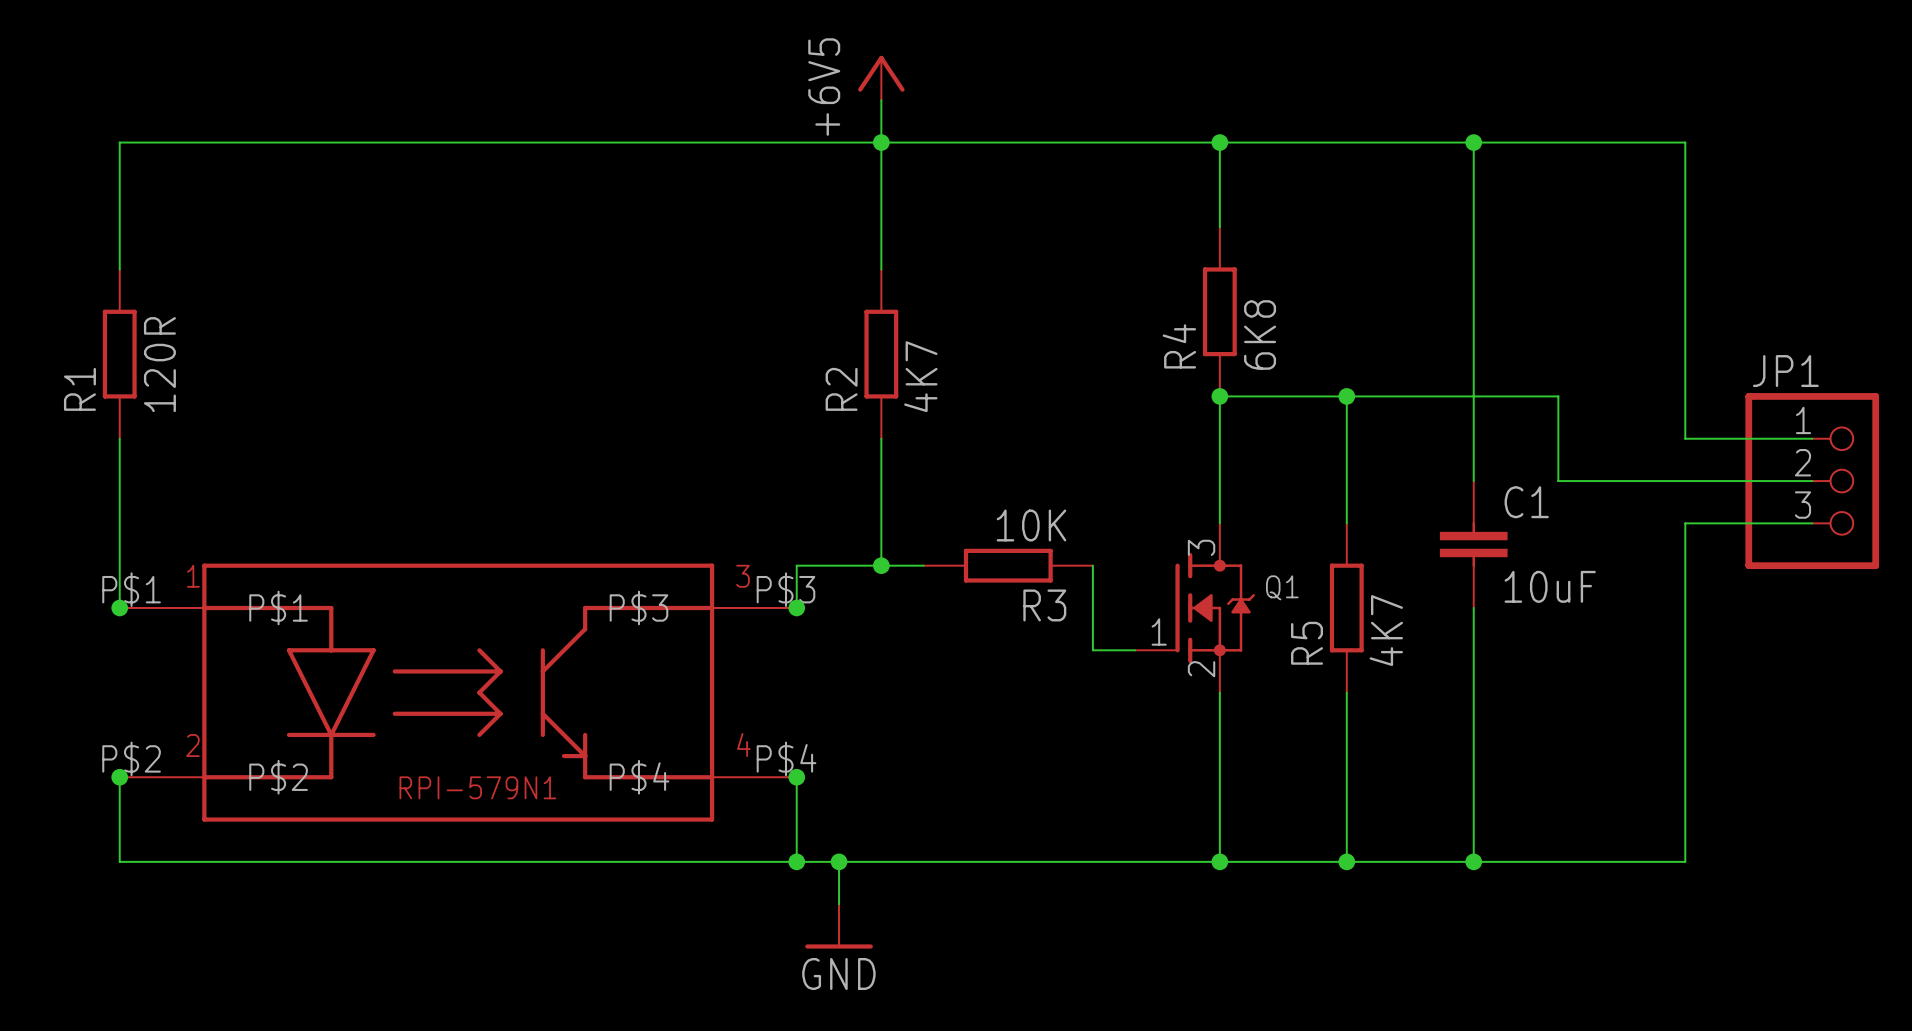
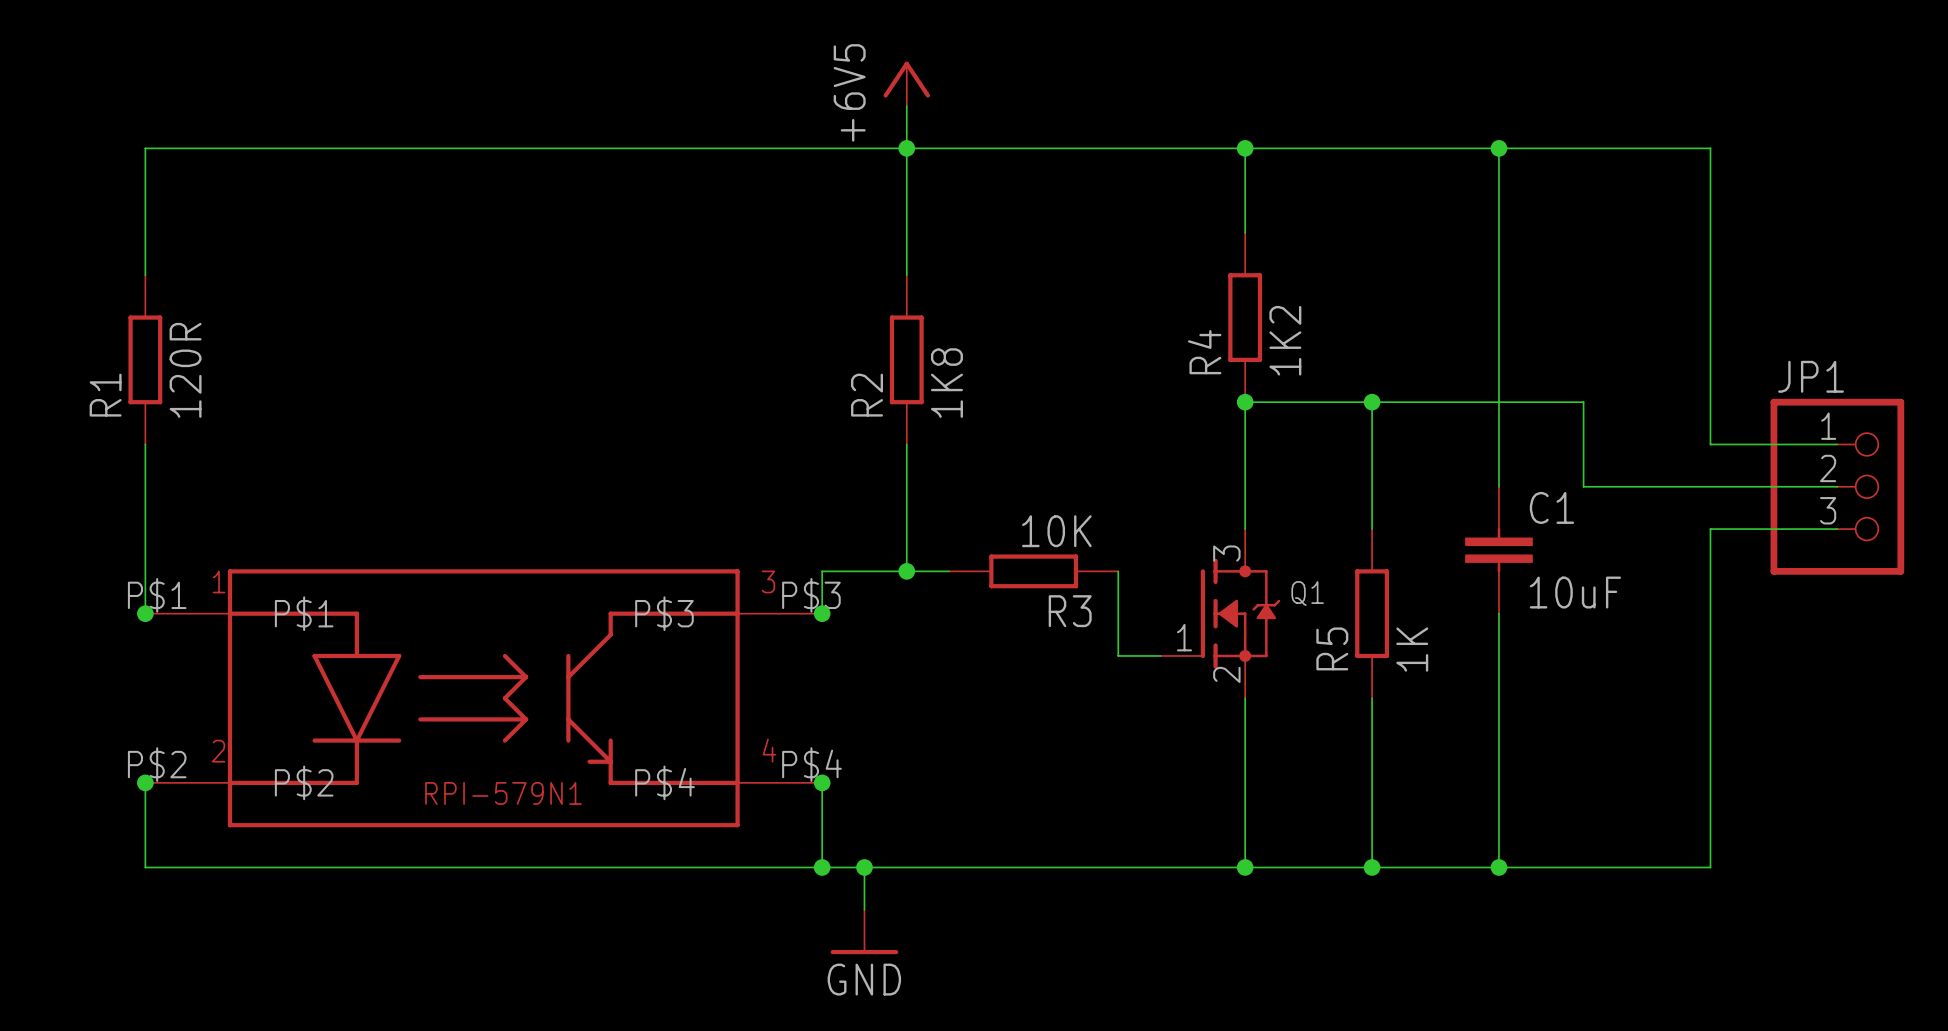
R4 value: 6K8 (1260, 334) -> 1K2 (1285, 340)
R2 value: 4K7 (920, 376) -> 1K8 (946, 383)
R5 value: 4K7 (1386, 630) -> 1K (1412, 649)

